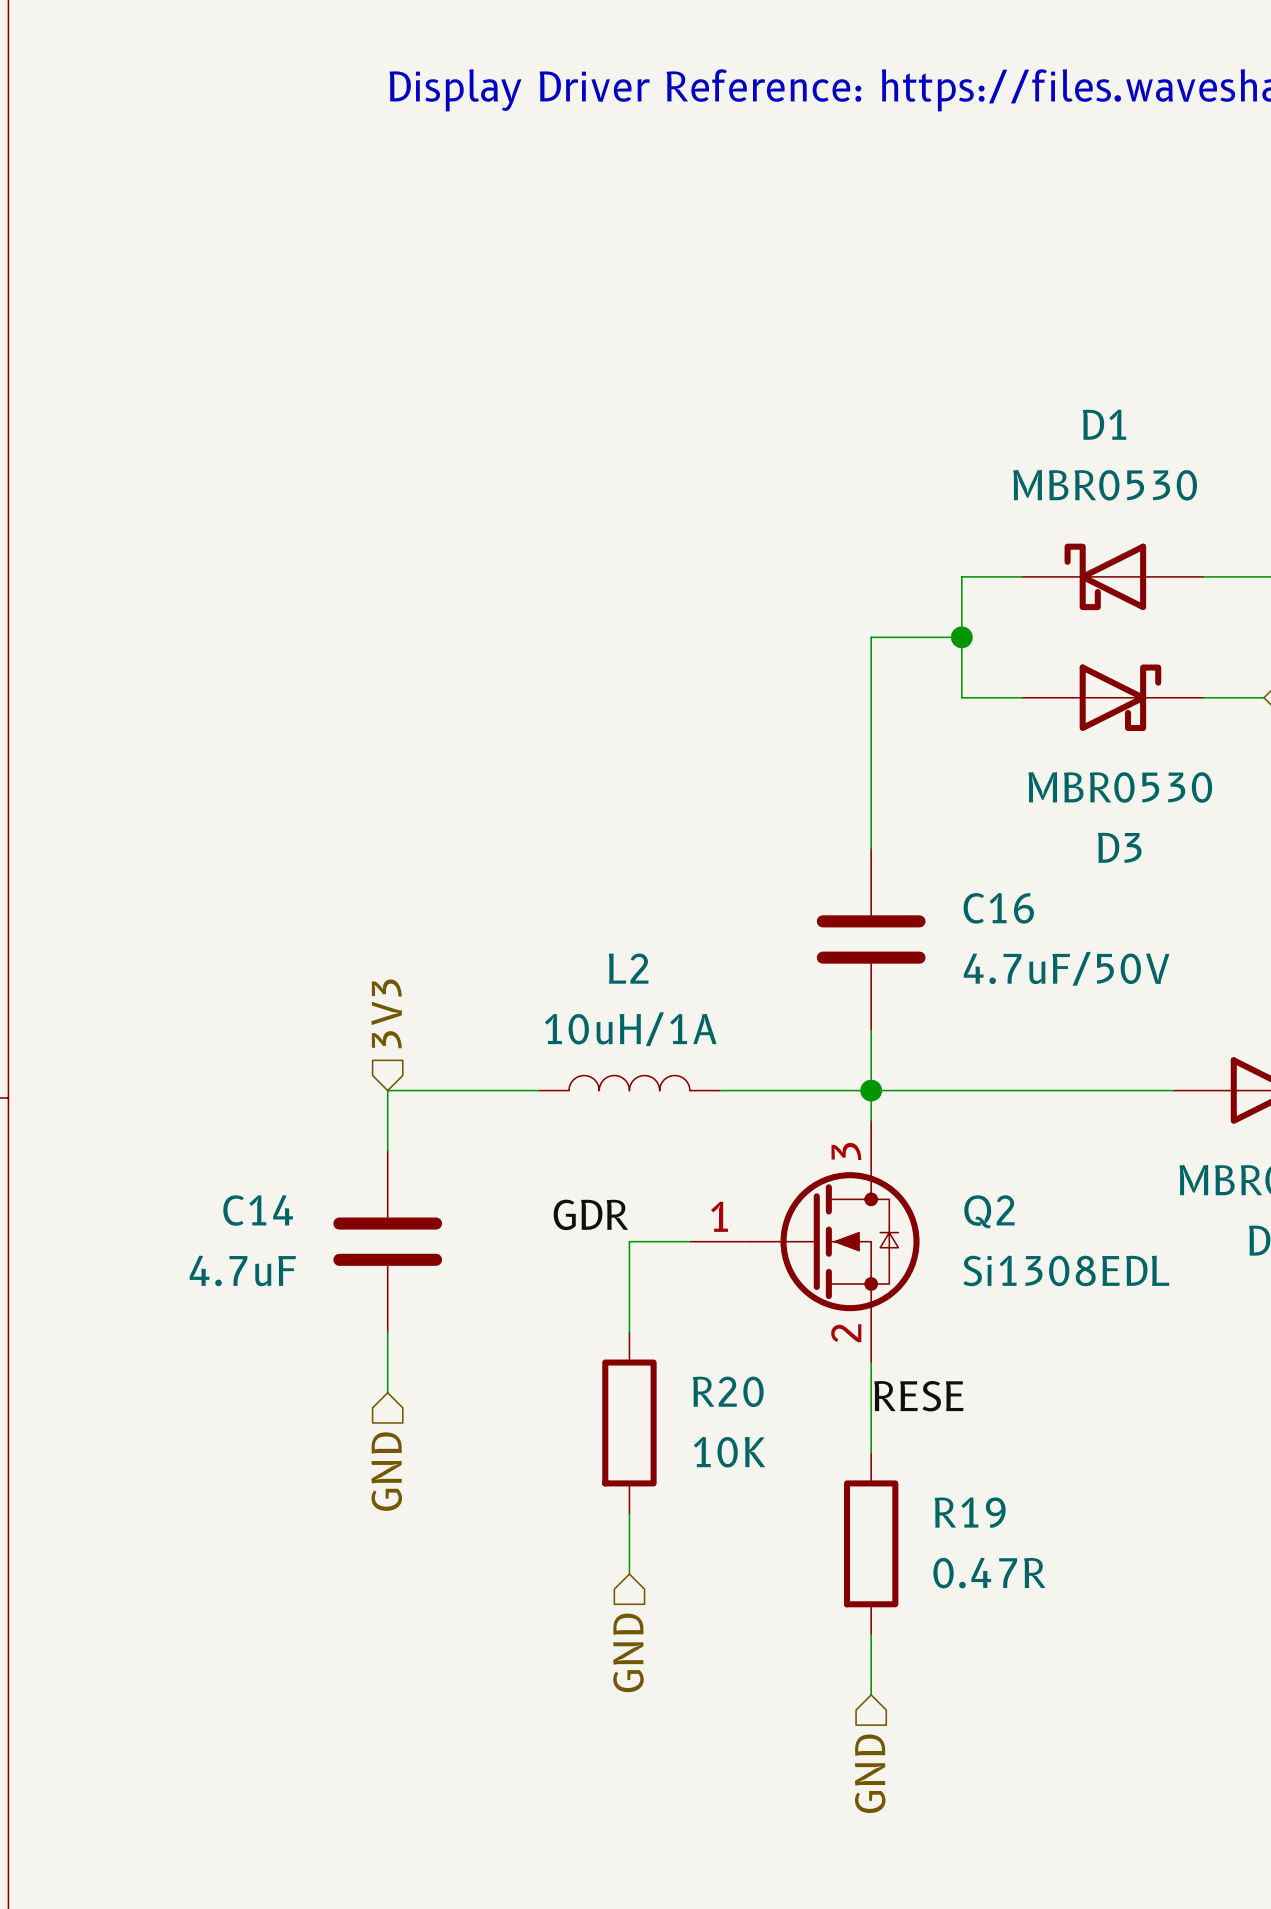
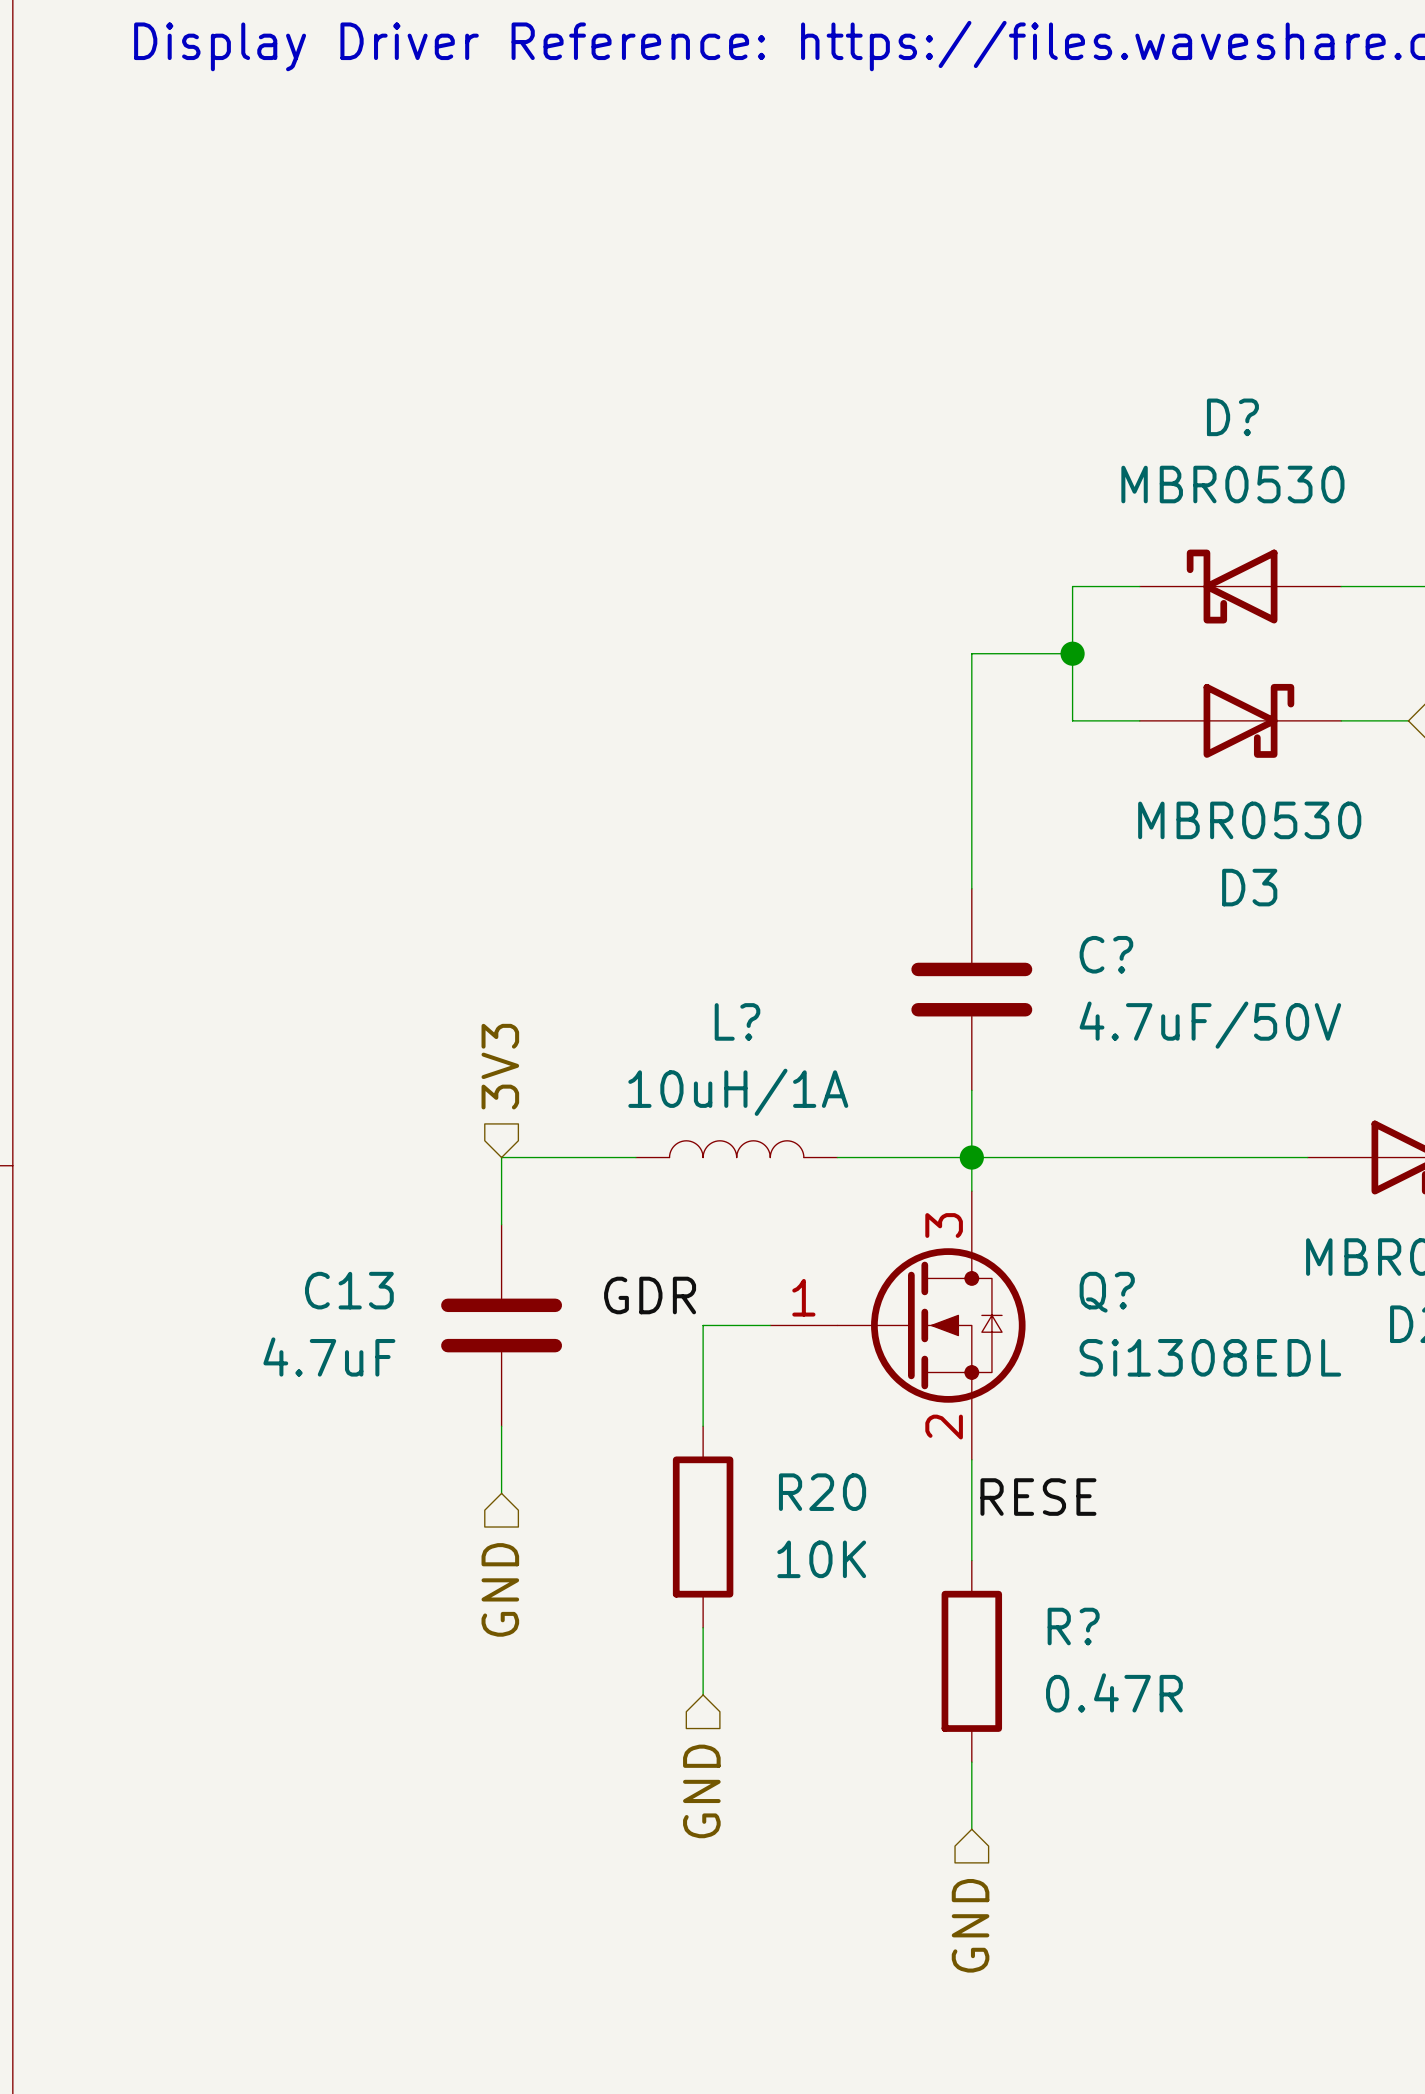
D1 name: D1 (1104, 424) -> D? (1232, 417)
C16 name: C16 (998, 908) -> C? (1106, 954)
hierarchical label position: 3V3 (386, 1013) -> 3V3 (500, 1066)
L2: 10uH/1A (629, 1083) -> none
L?: none -> 10uH/1A (736, 1149)
wire: (448, 1090) (387, 1090) (387, 1151) -> (501, 1157) (501, 1224)
Q2 name: Q2 (989, 1211) -> Q? (1107, 1292)
C14: 4.7uF (387, 1241) -> none
C13: none -> 4.7uF (501, 1325)
wire: (387, 1332) (387, 1392) -> (501, 1426) (501, 1493)
hierarchical label position: GND (386, 1471) -> GND (500, 1589)
R19 name: R19 (970, 1512) -> R? (1073, 1626)

